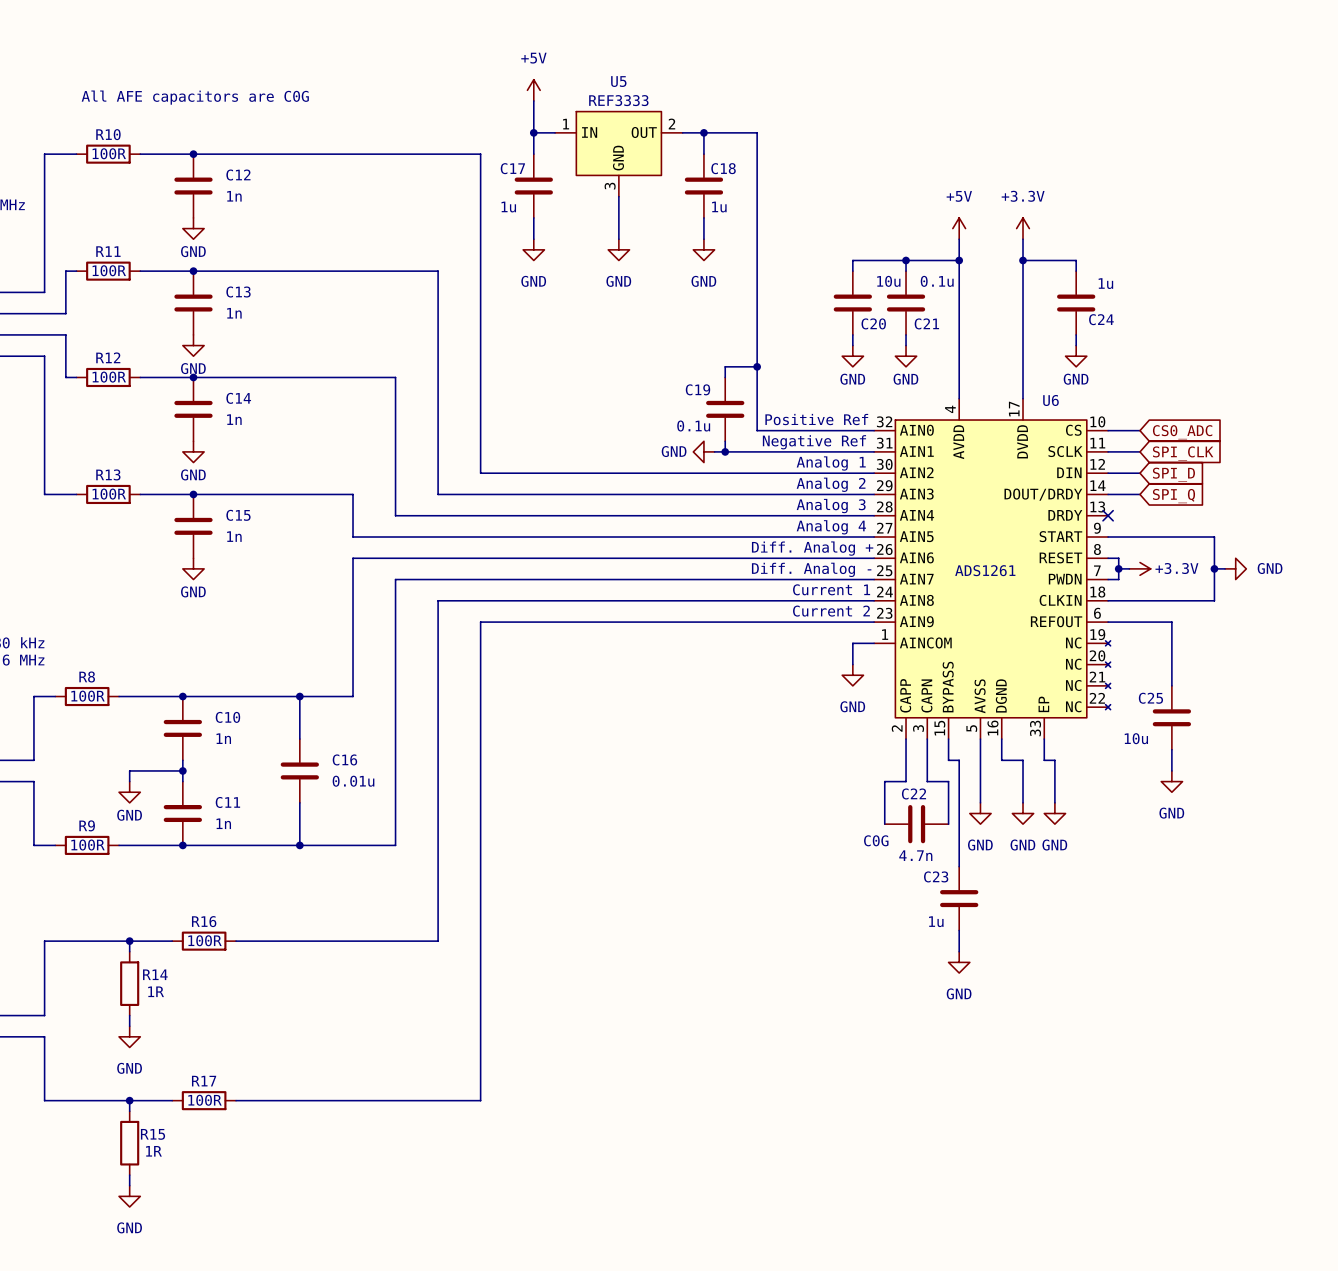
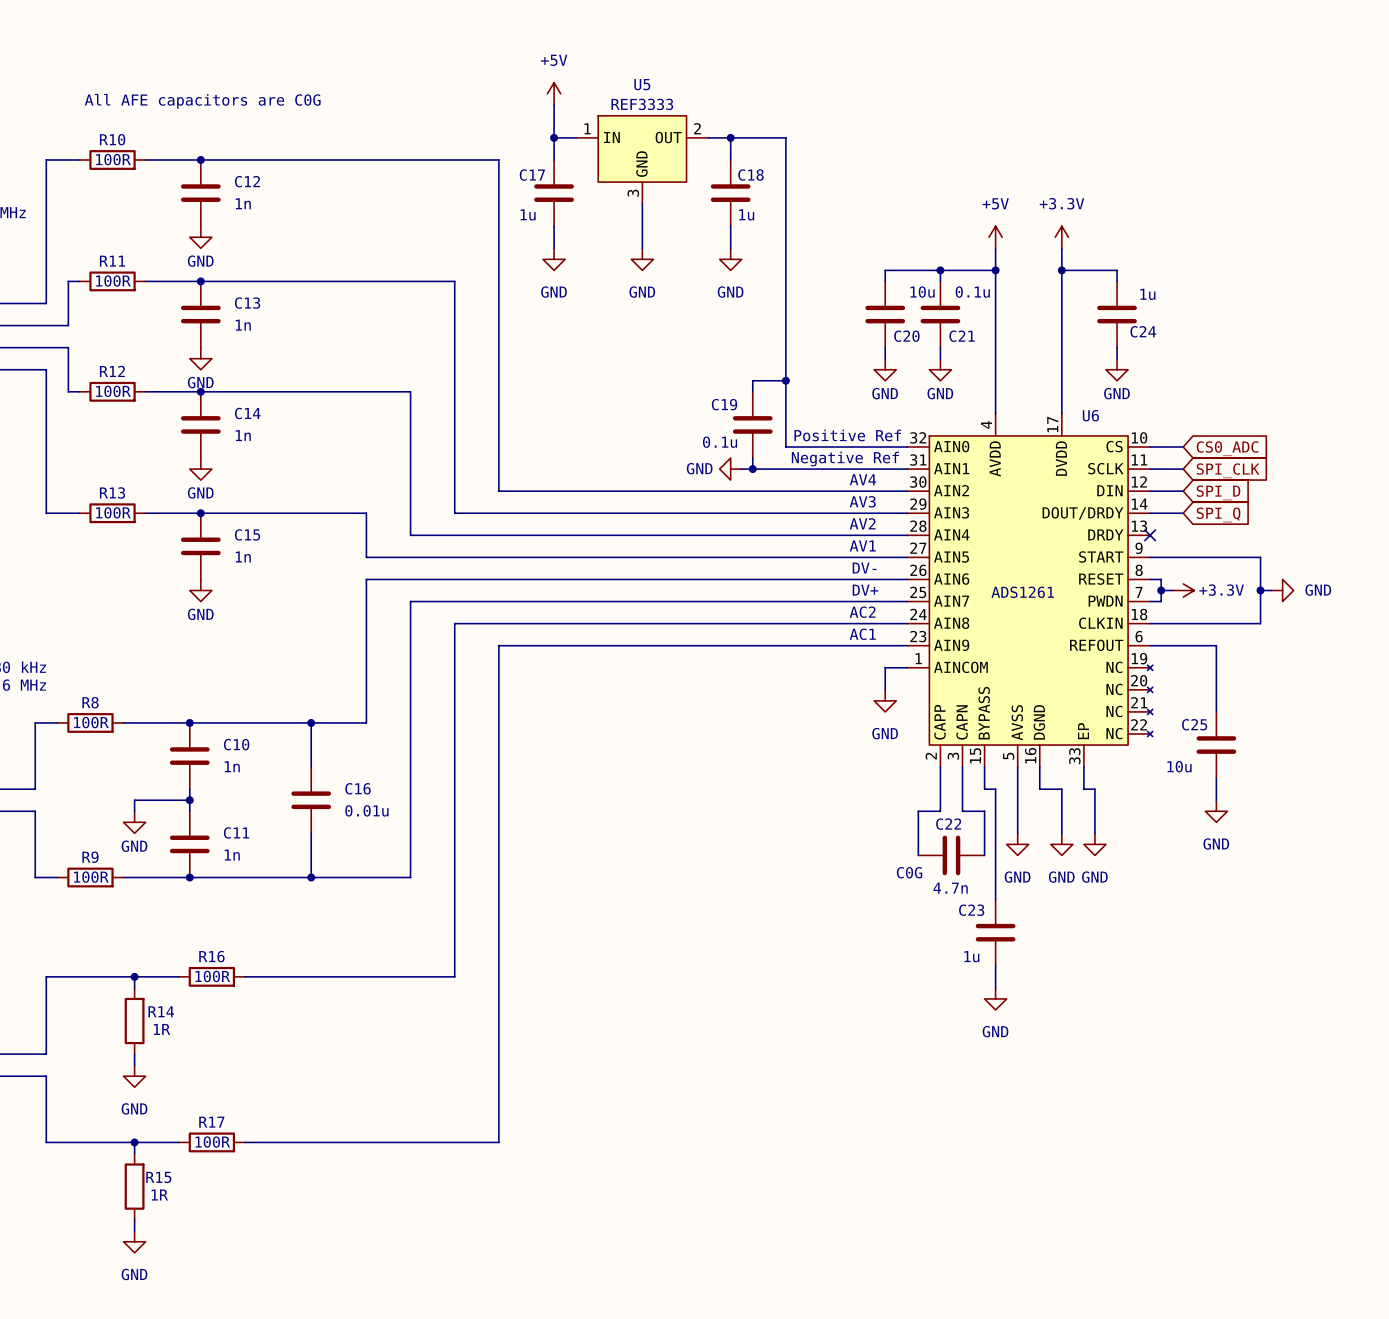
text: Analog 1 (831, 463) -> AV4 (862, 479)
text: Analog 2 (831, 484) -> AV3 (862, 501)
text: Analog 3 (831, 506) -> AV2 (862, 523)
text: Analog 4 (831, 527) -> AV1 (862, 545)
text: none -> DV- (864, 568)
text: Diff. Analog + (812, 548) -> none
text: none -> DV+ (865, 590)
text: Diff. Analog - (811, 569) -> none
text: Current 1 (831, 589) -> AC2 (862, 612)
text: Current 2 (831, 611) -> AC1 (862, 634)

